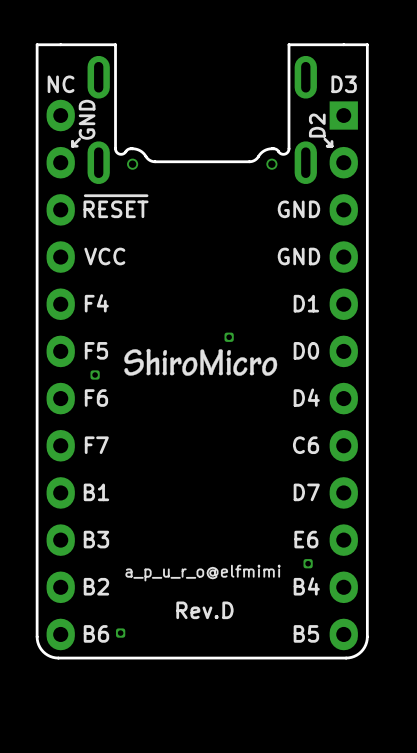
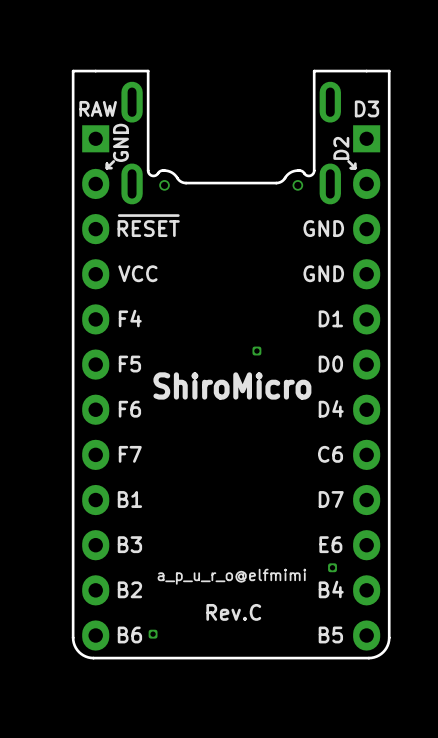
text: NC (61, 84) -> RAW (98, 108)
part footprint: [46, 99, 75, 651] -> [82, 125, 110, 651]
drawing: [124, 348, 278, 376] -> none
text: none -> ShiroMicro (232, 385)
part: (95, 374) -> none
text: Rev.D (204, 610) -> Rev.C (233, 612)

